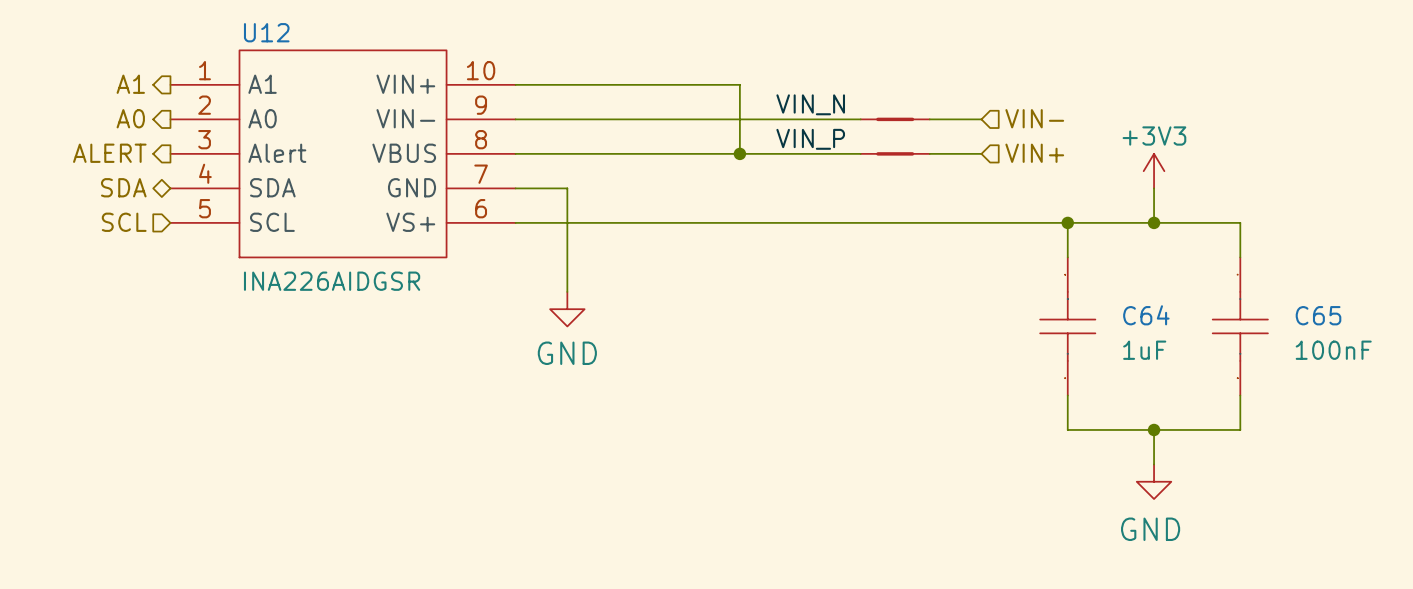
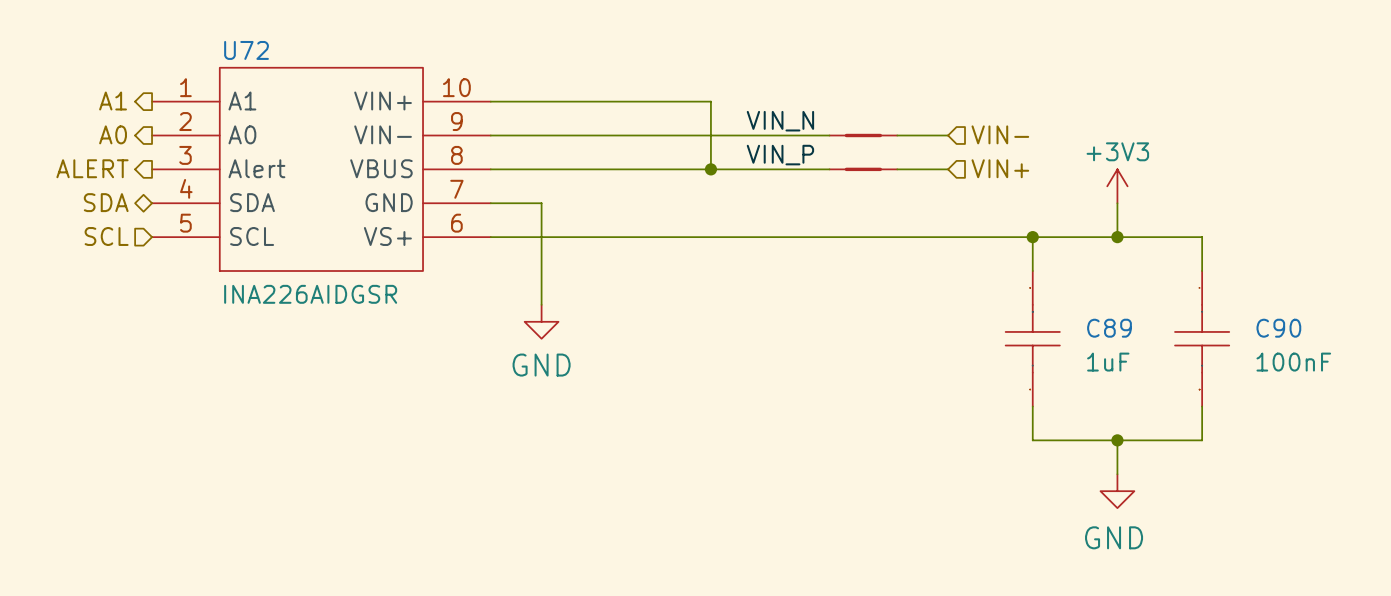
U12 name: U12 (266, 32) -> U72 (246, 50)
C64 name: C64 (1146, 315) -> C89 (1109, 328)
C65 name: C65 (1318, 315) -> C90 (1278, 328)

